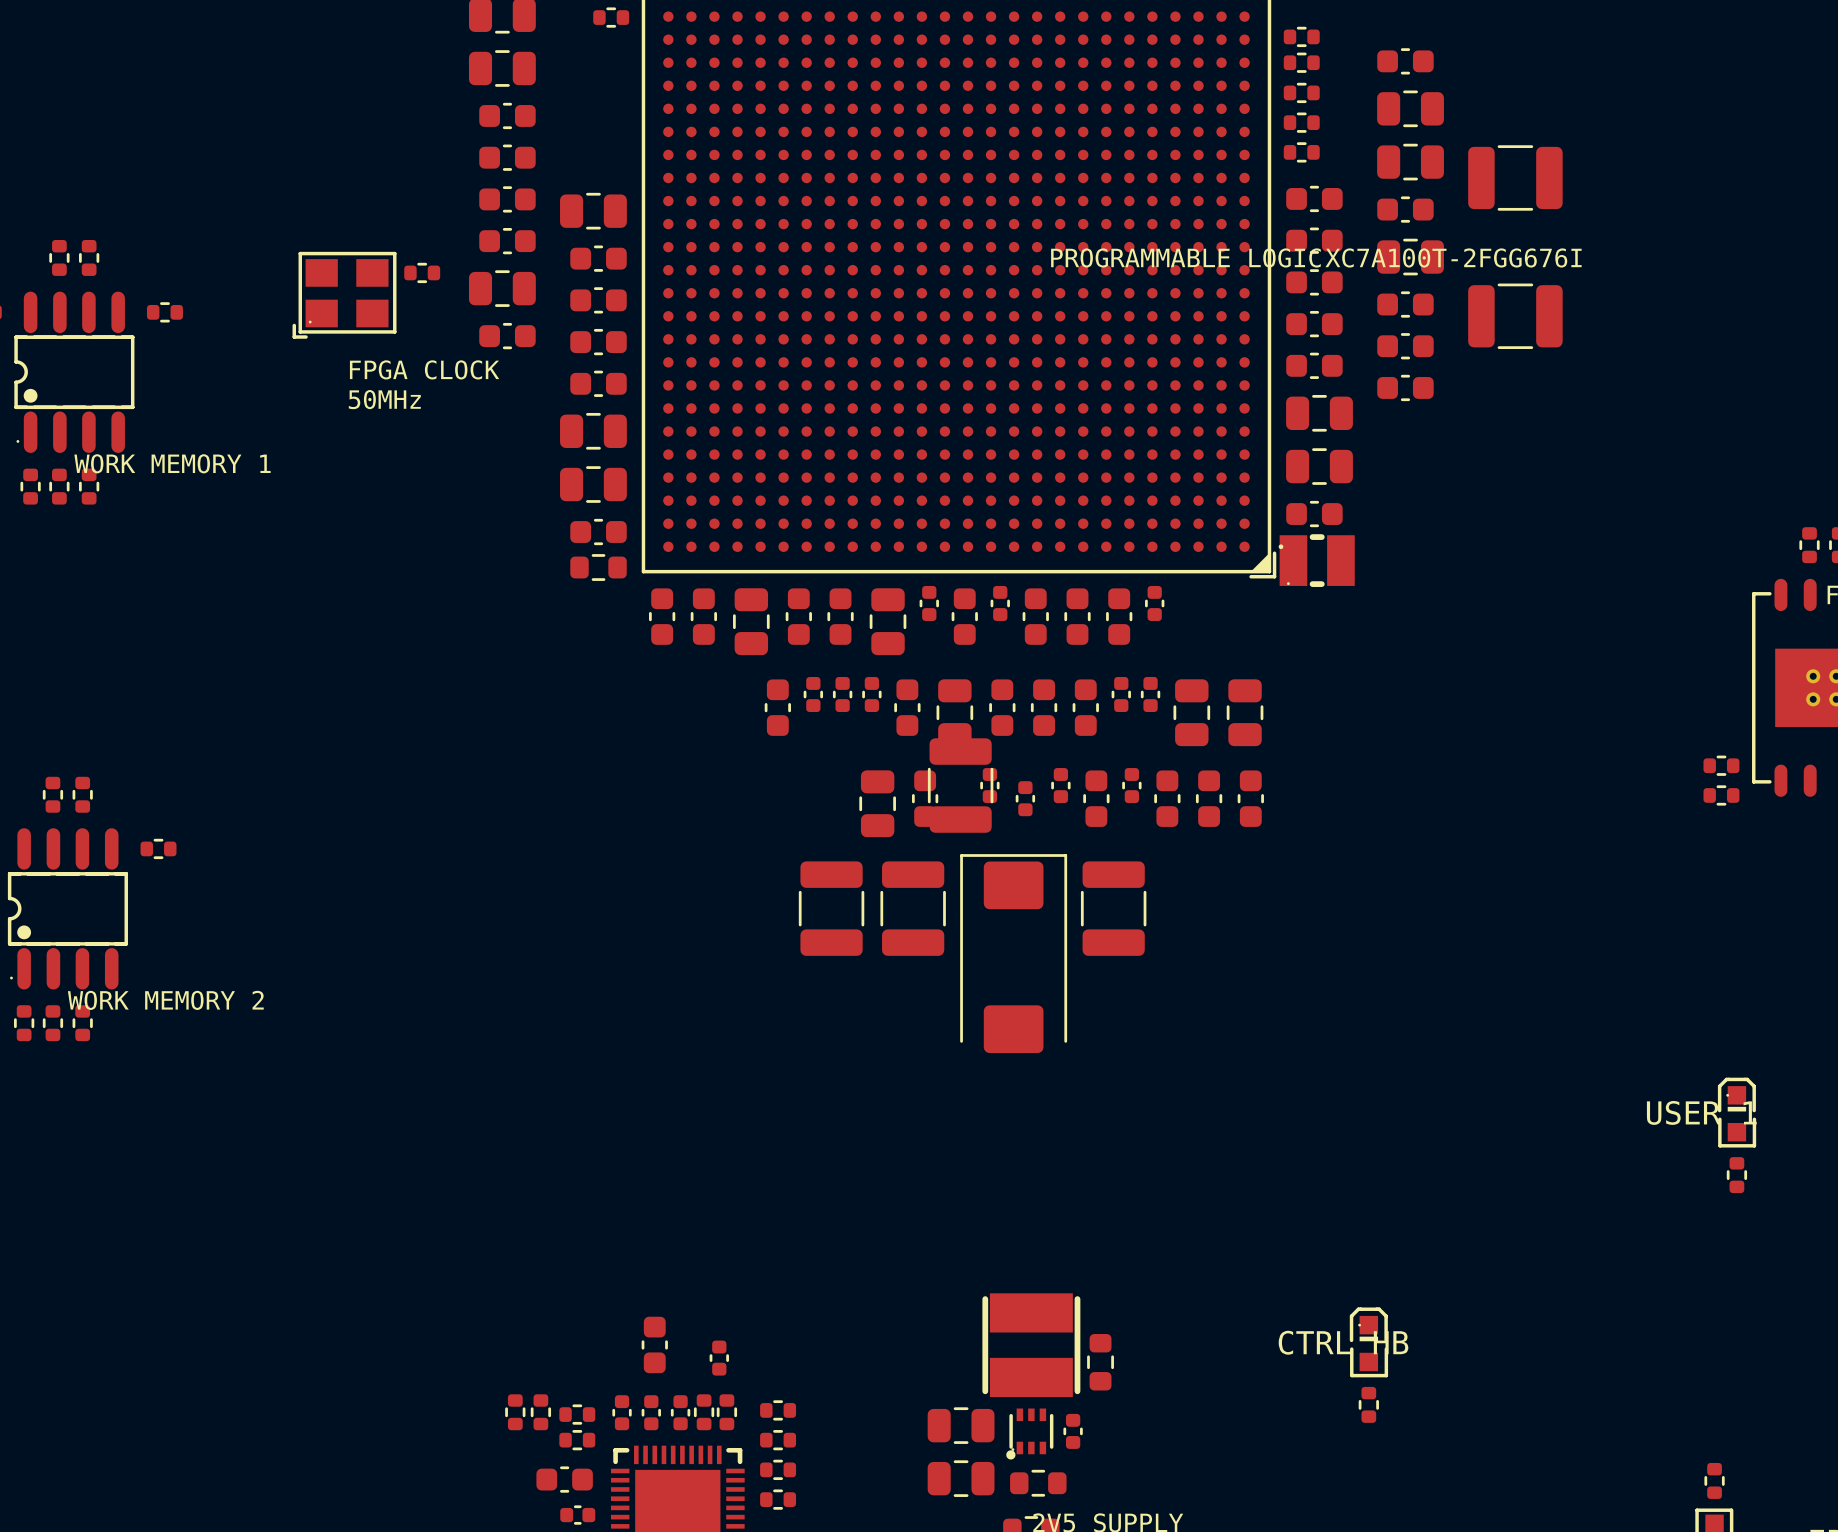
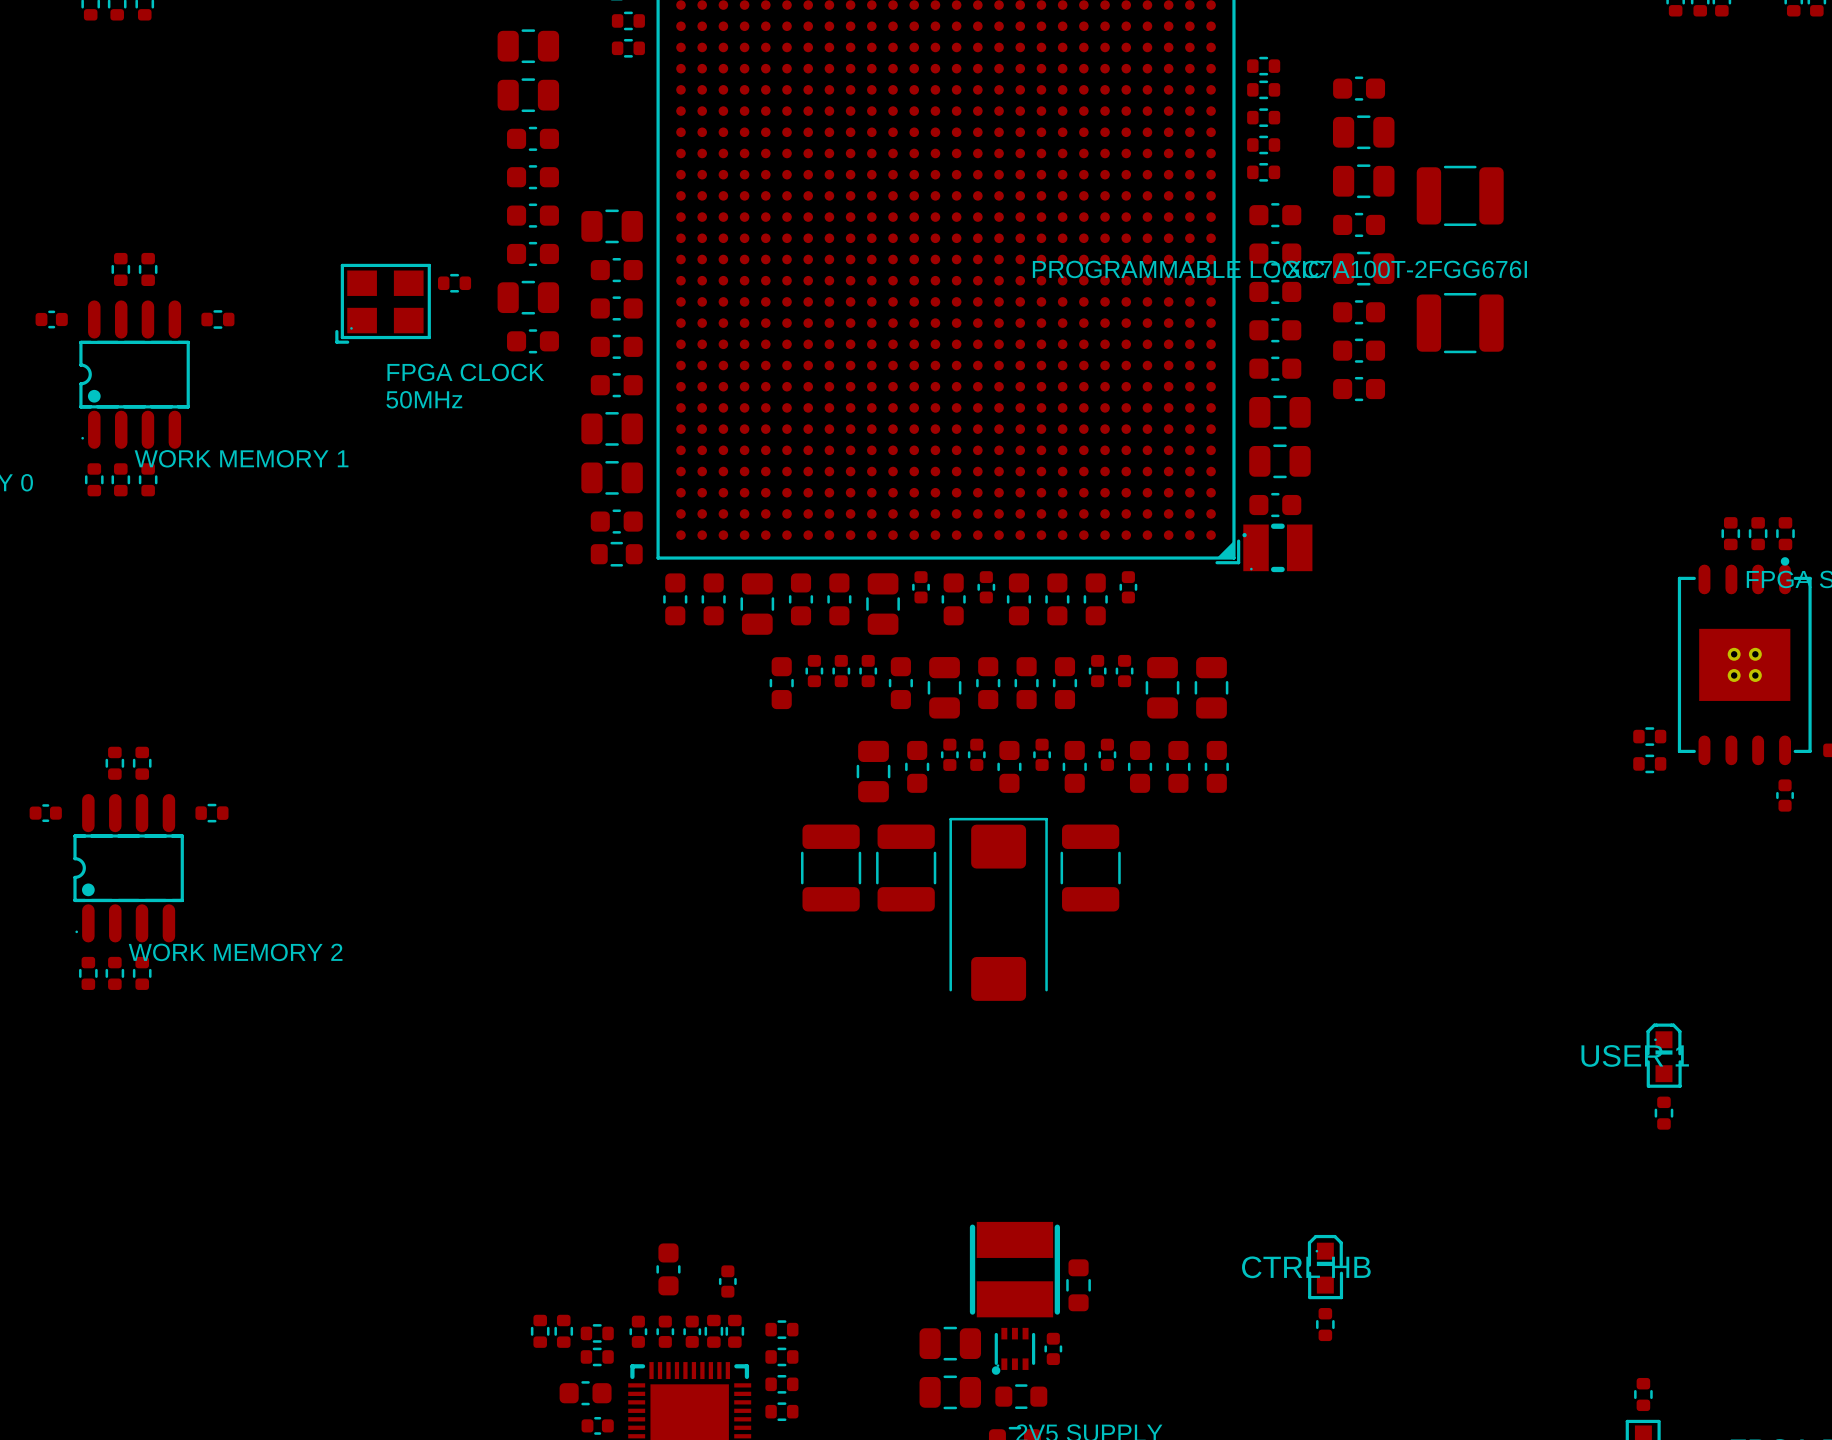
part footprint: [927, 738, 994, 833] -> [940, 738, 959, 771]
part footprint: [1015, 781, 1036, 817] -> [997, 740, 1022, 793]

